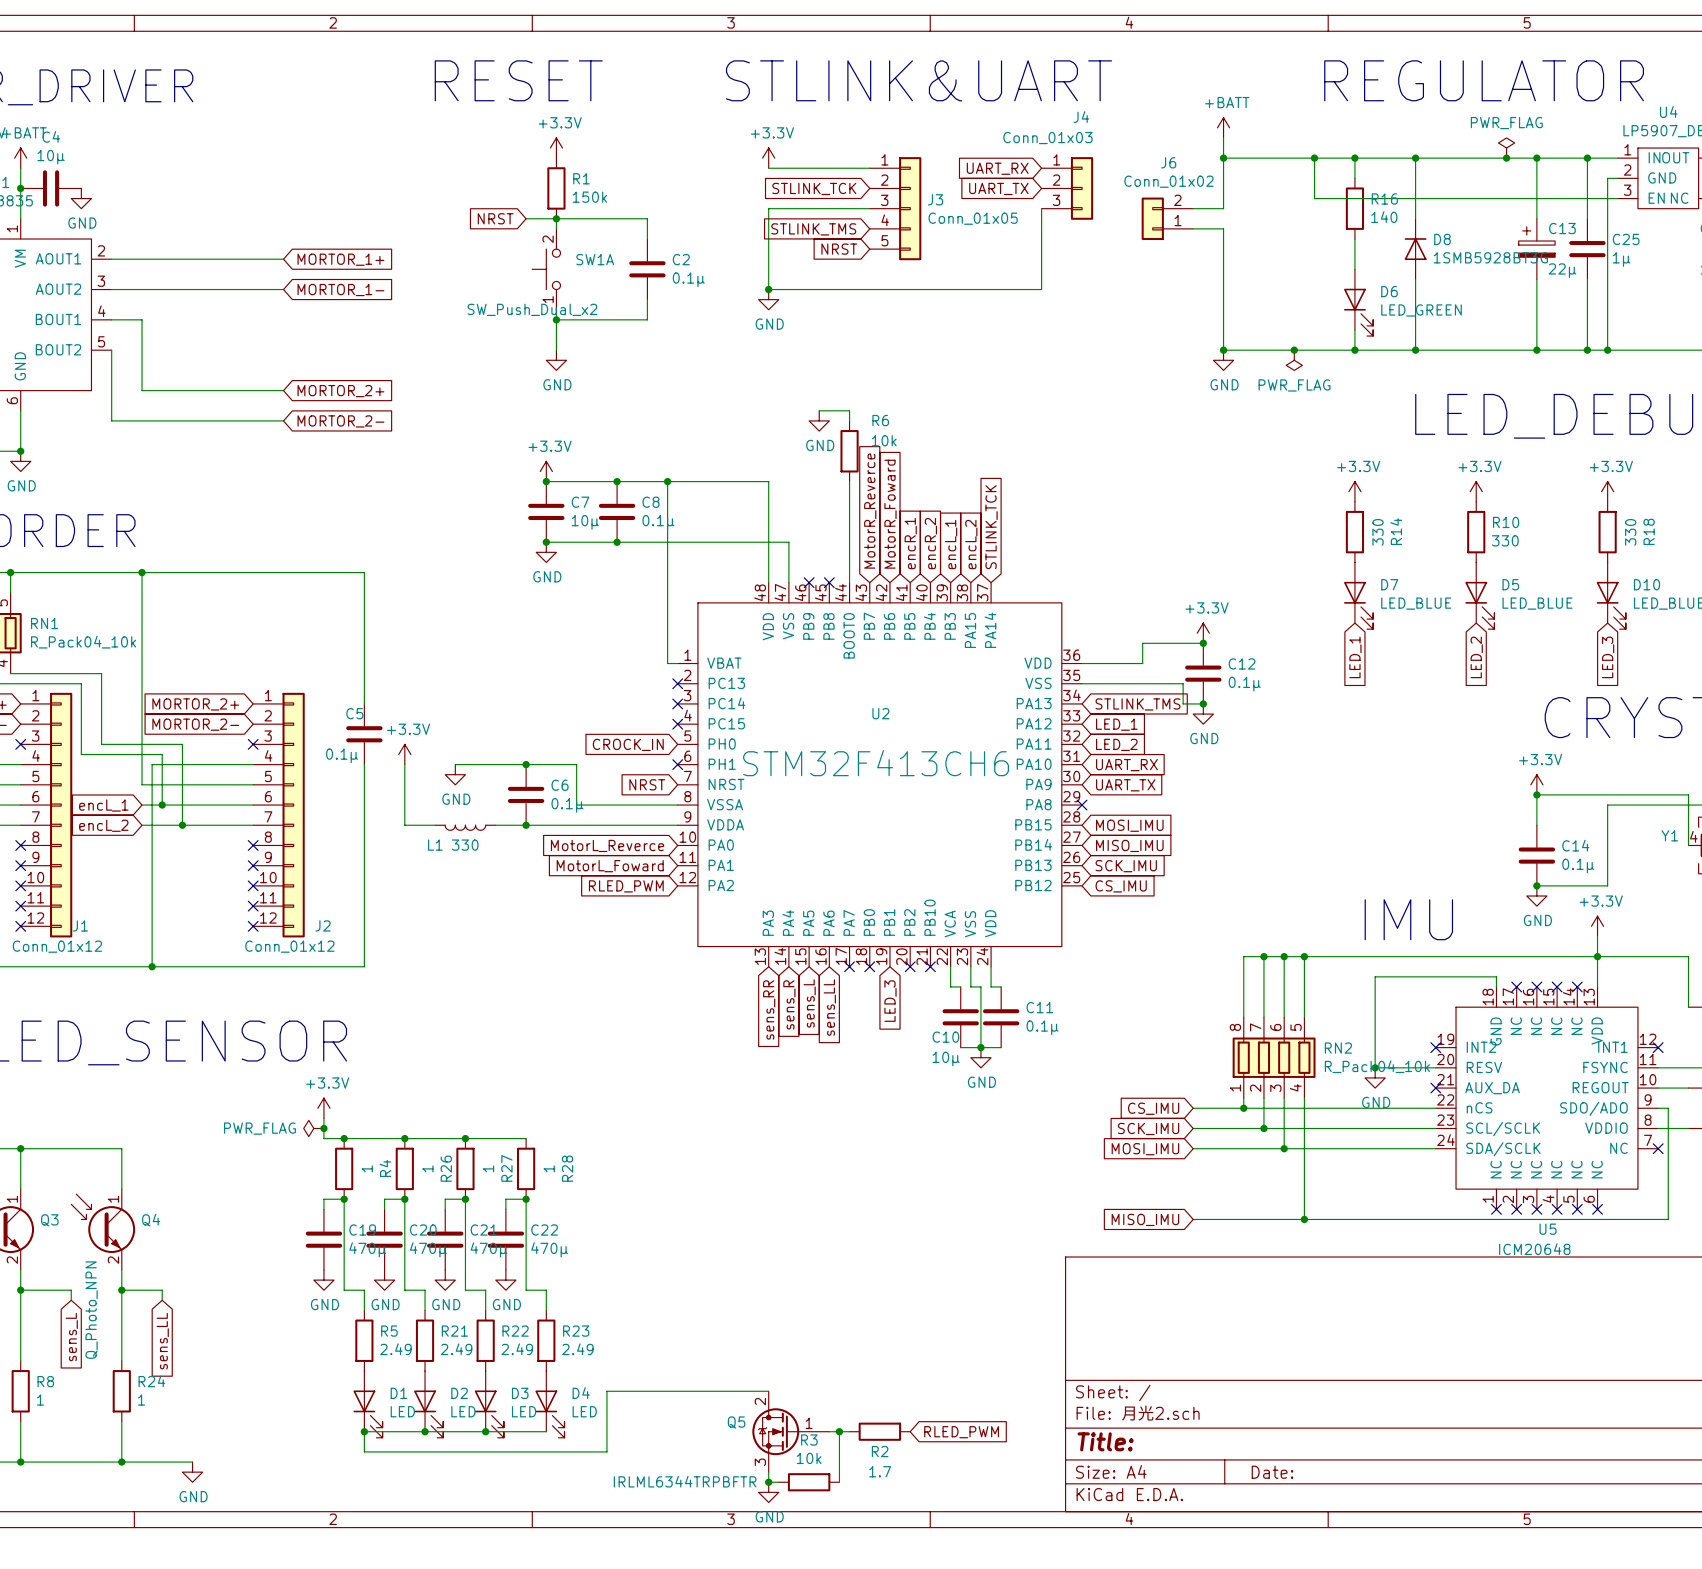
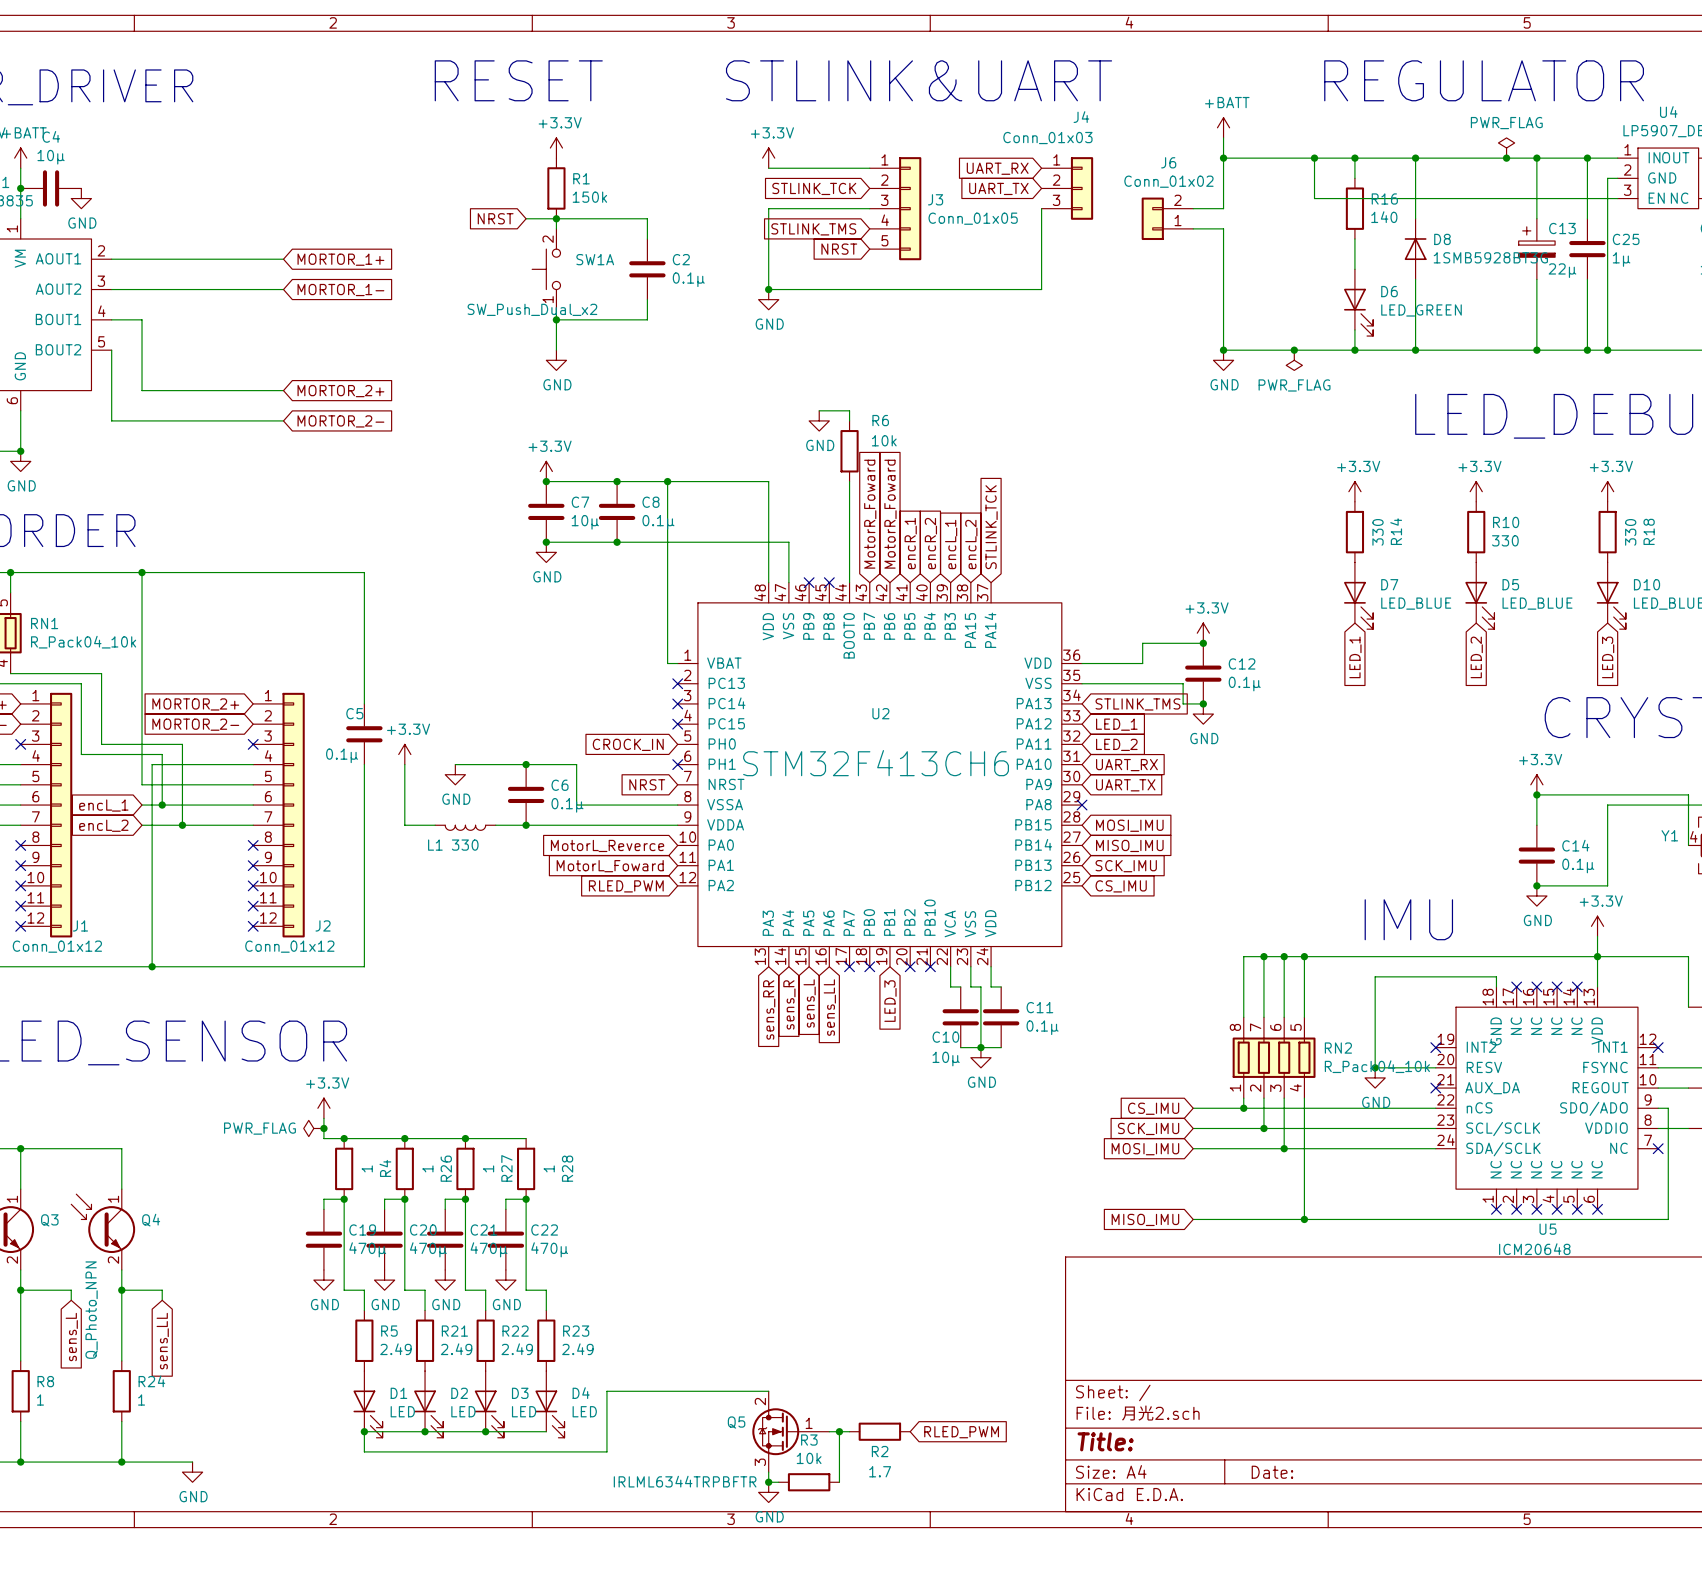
global label: MotorR_Reverce (870, 511) -> MotorR_Foward (870, 514)

